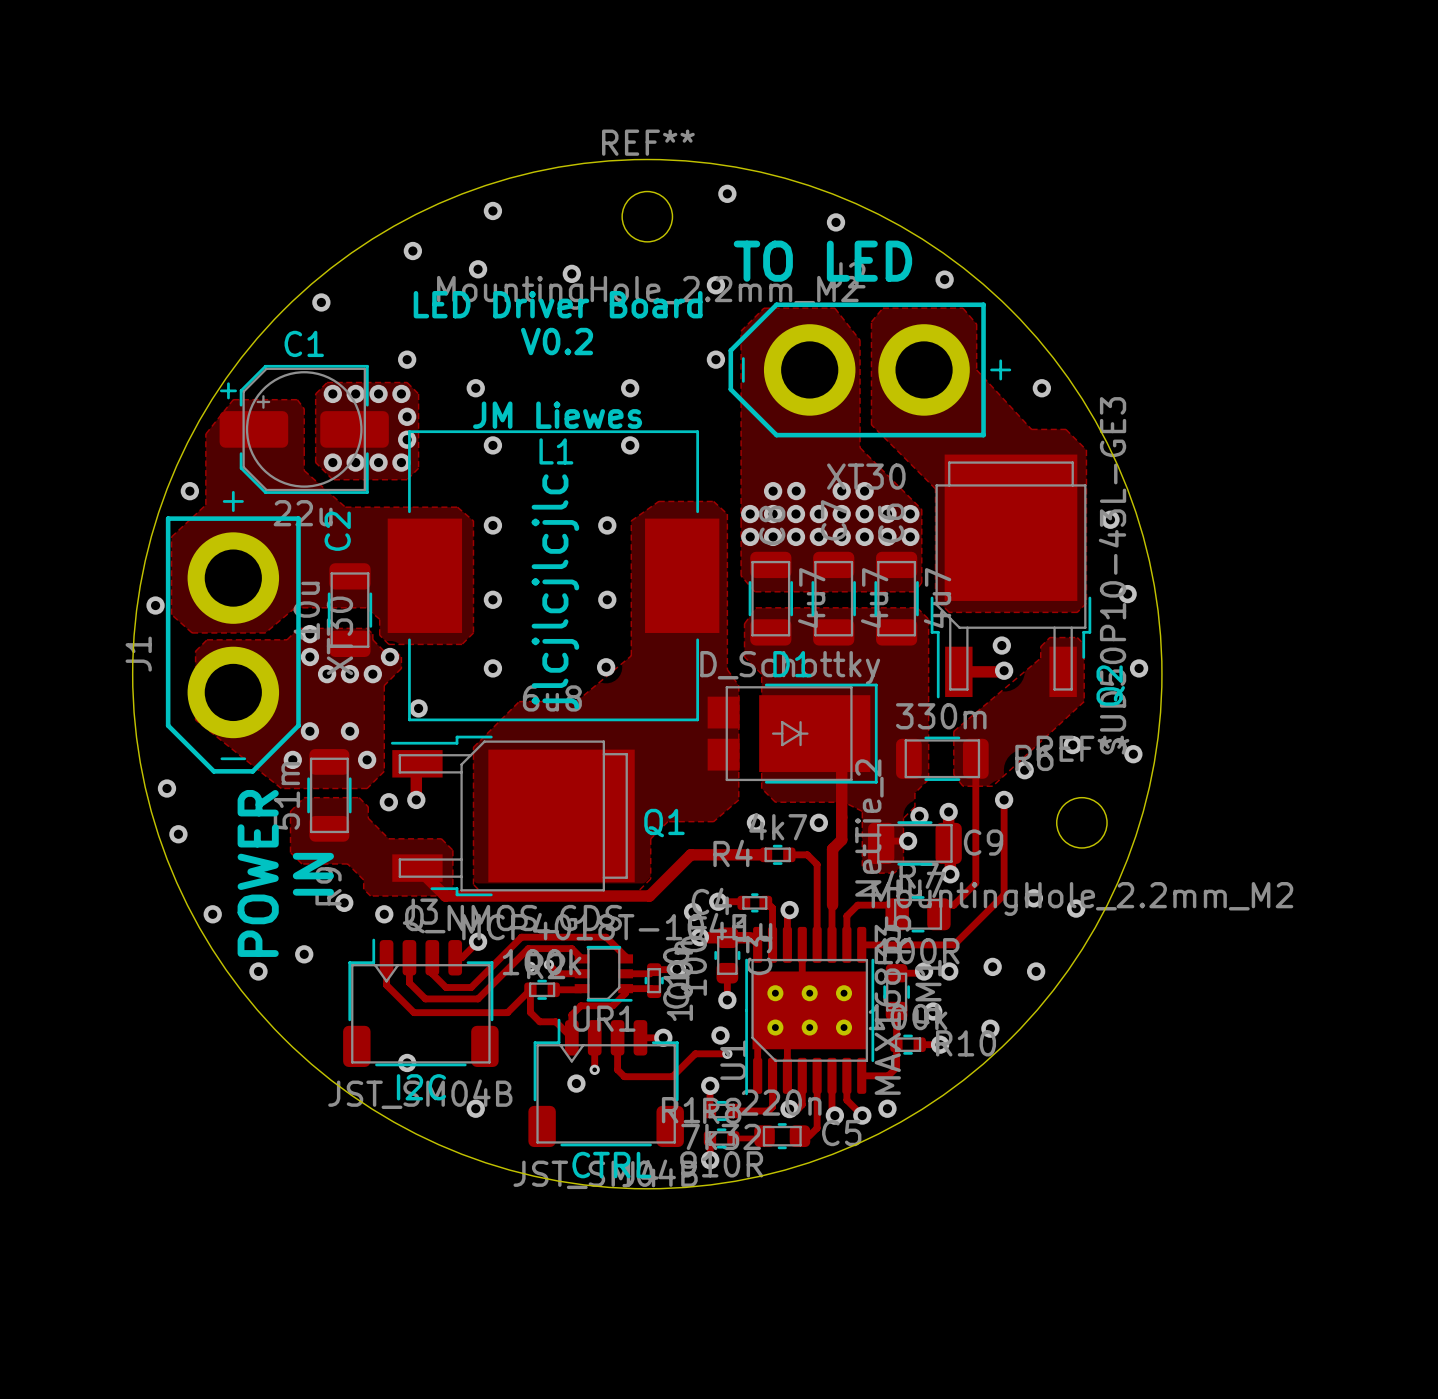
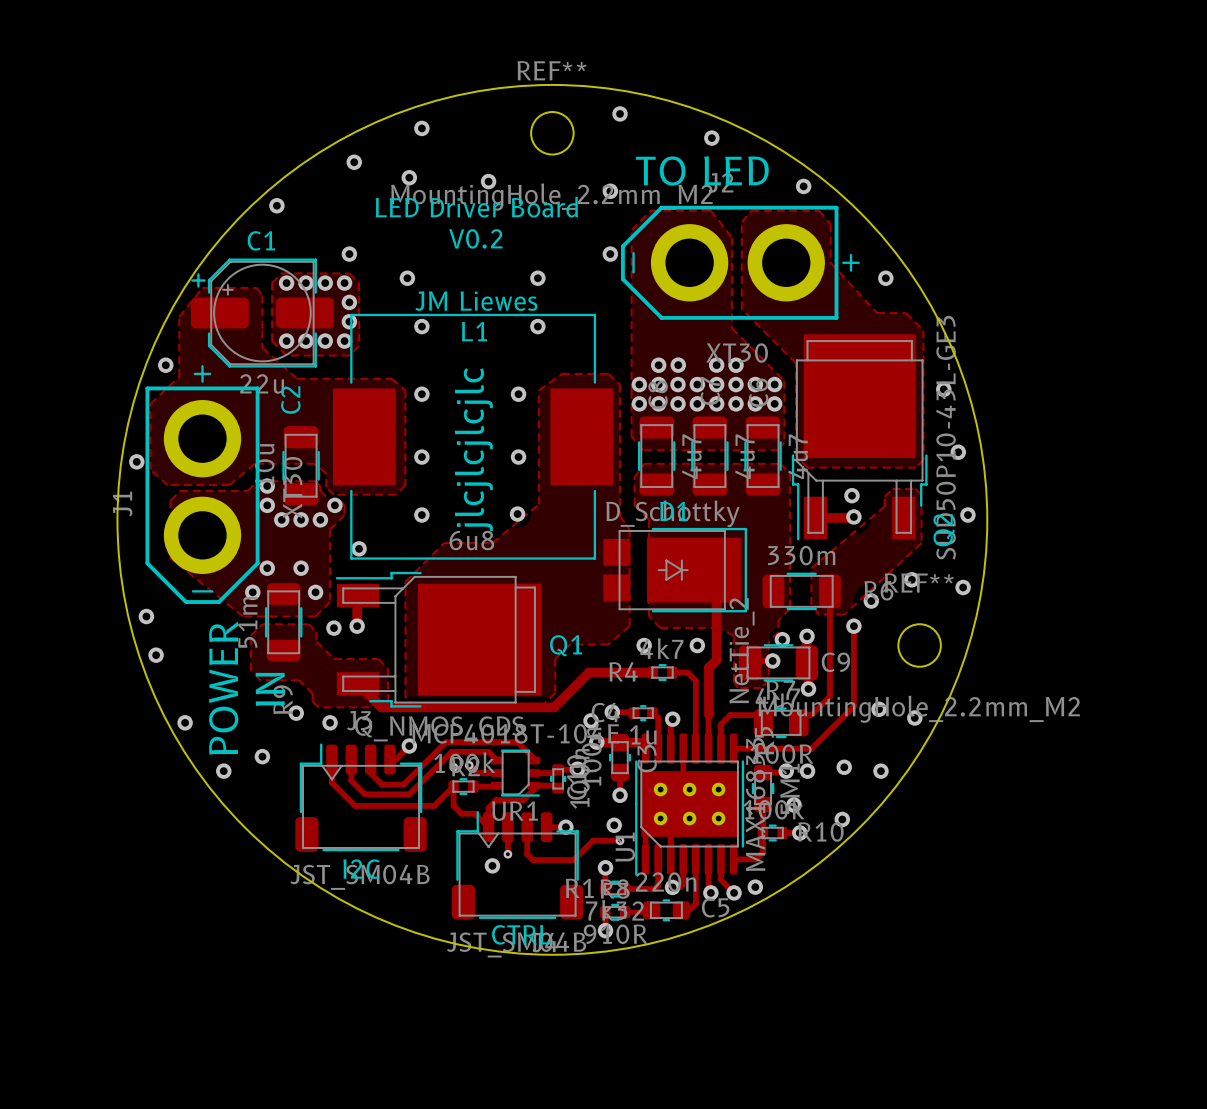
via: (407, 1062) -> none
via: (475, 1108) -> none

